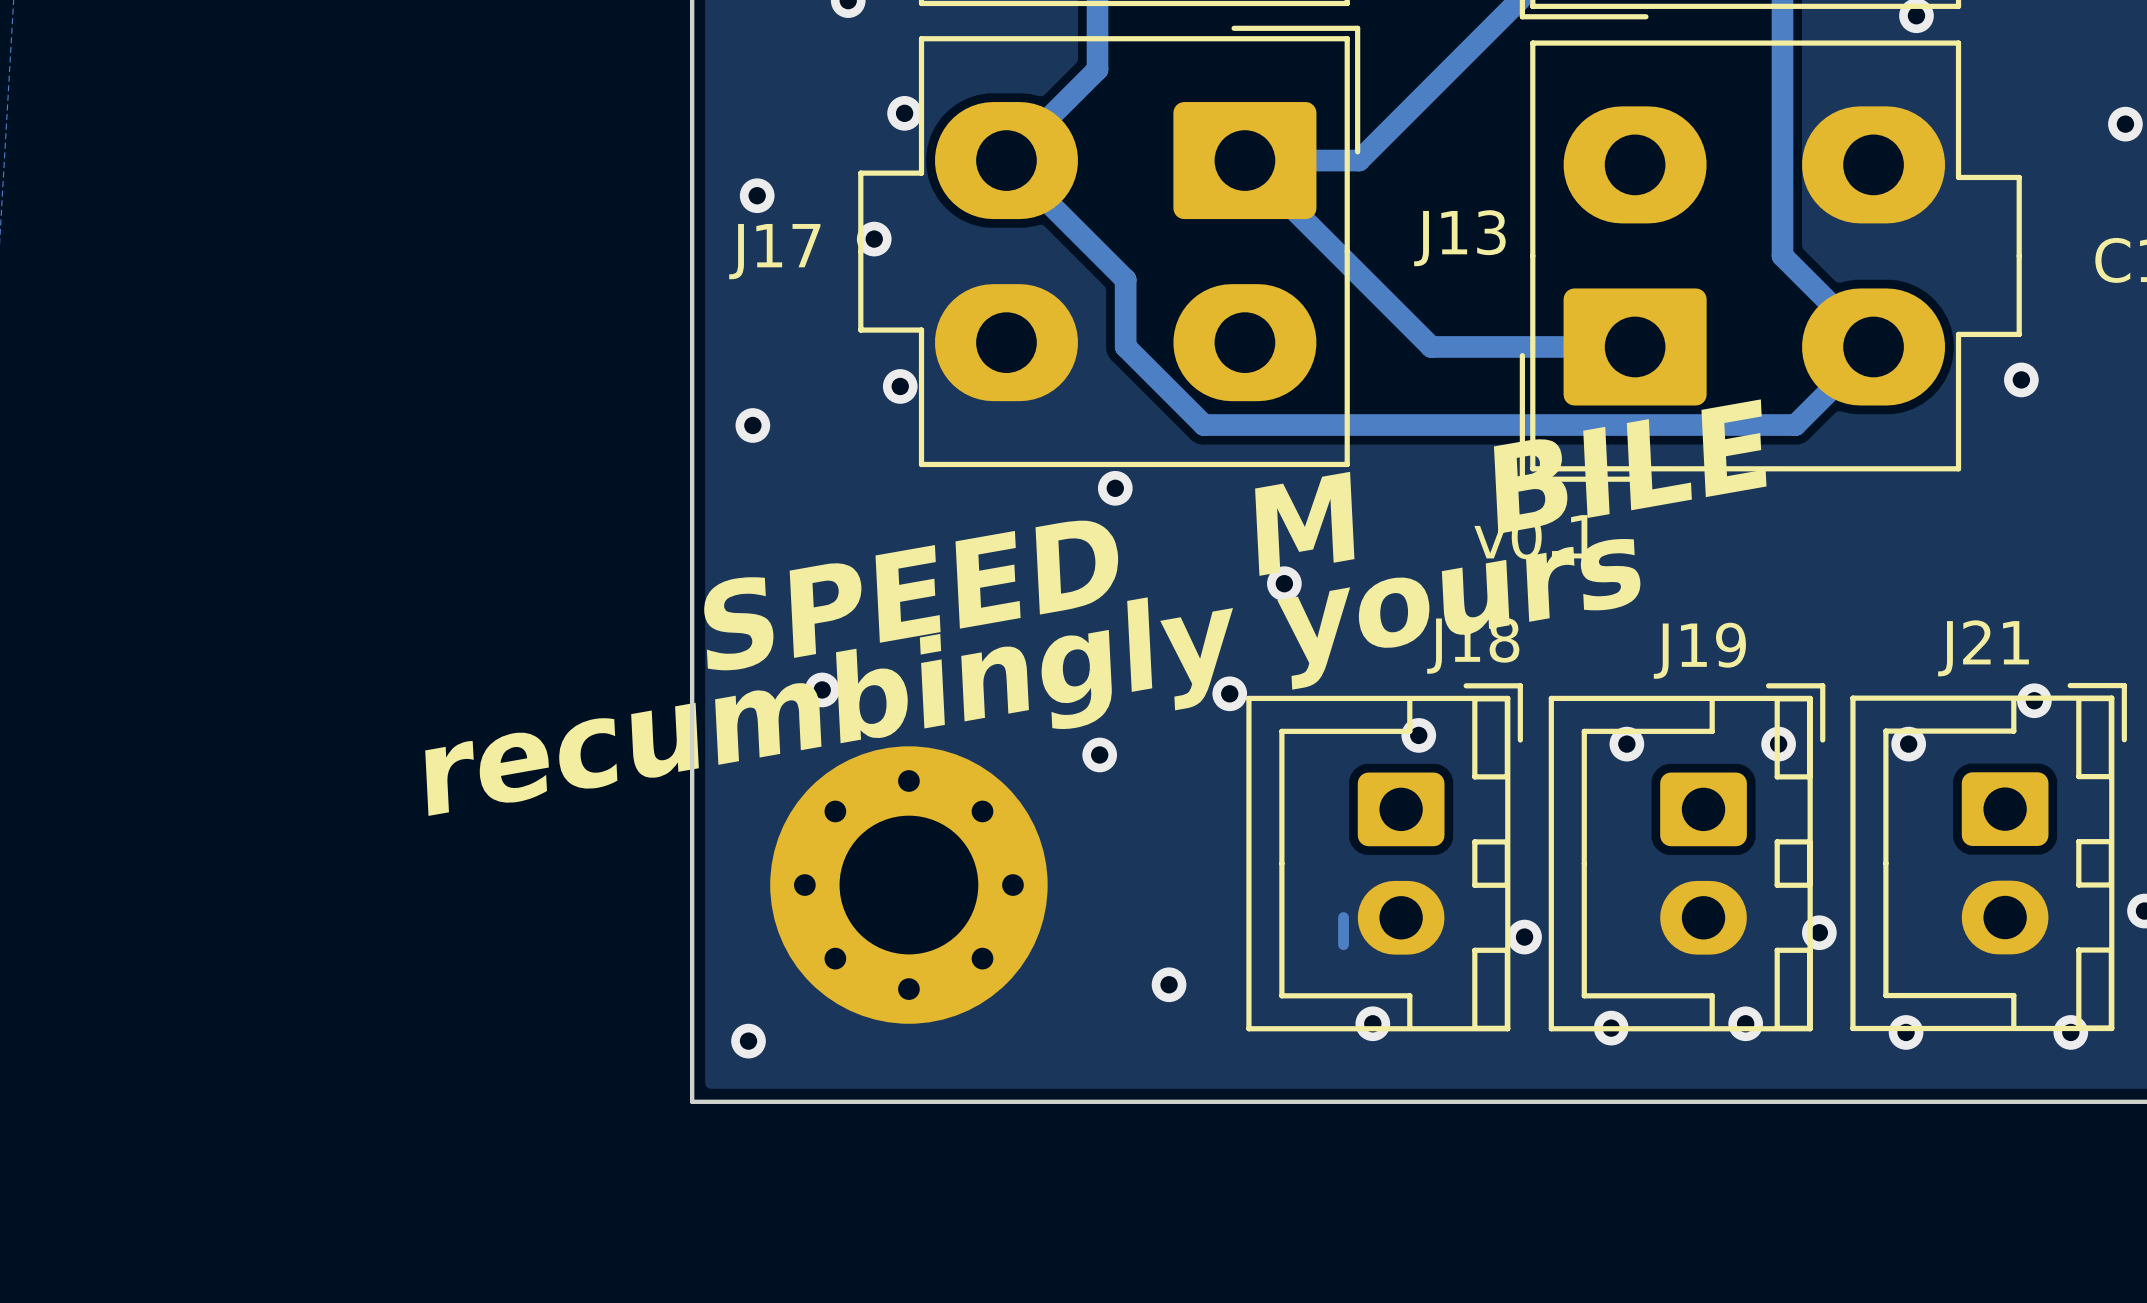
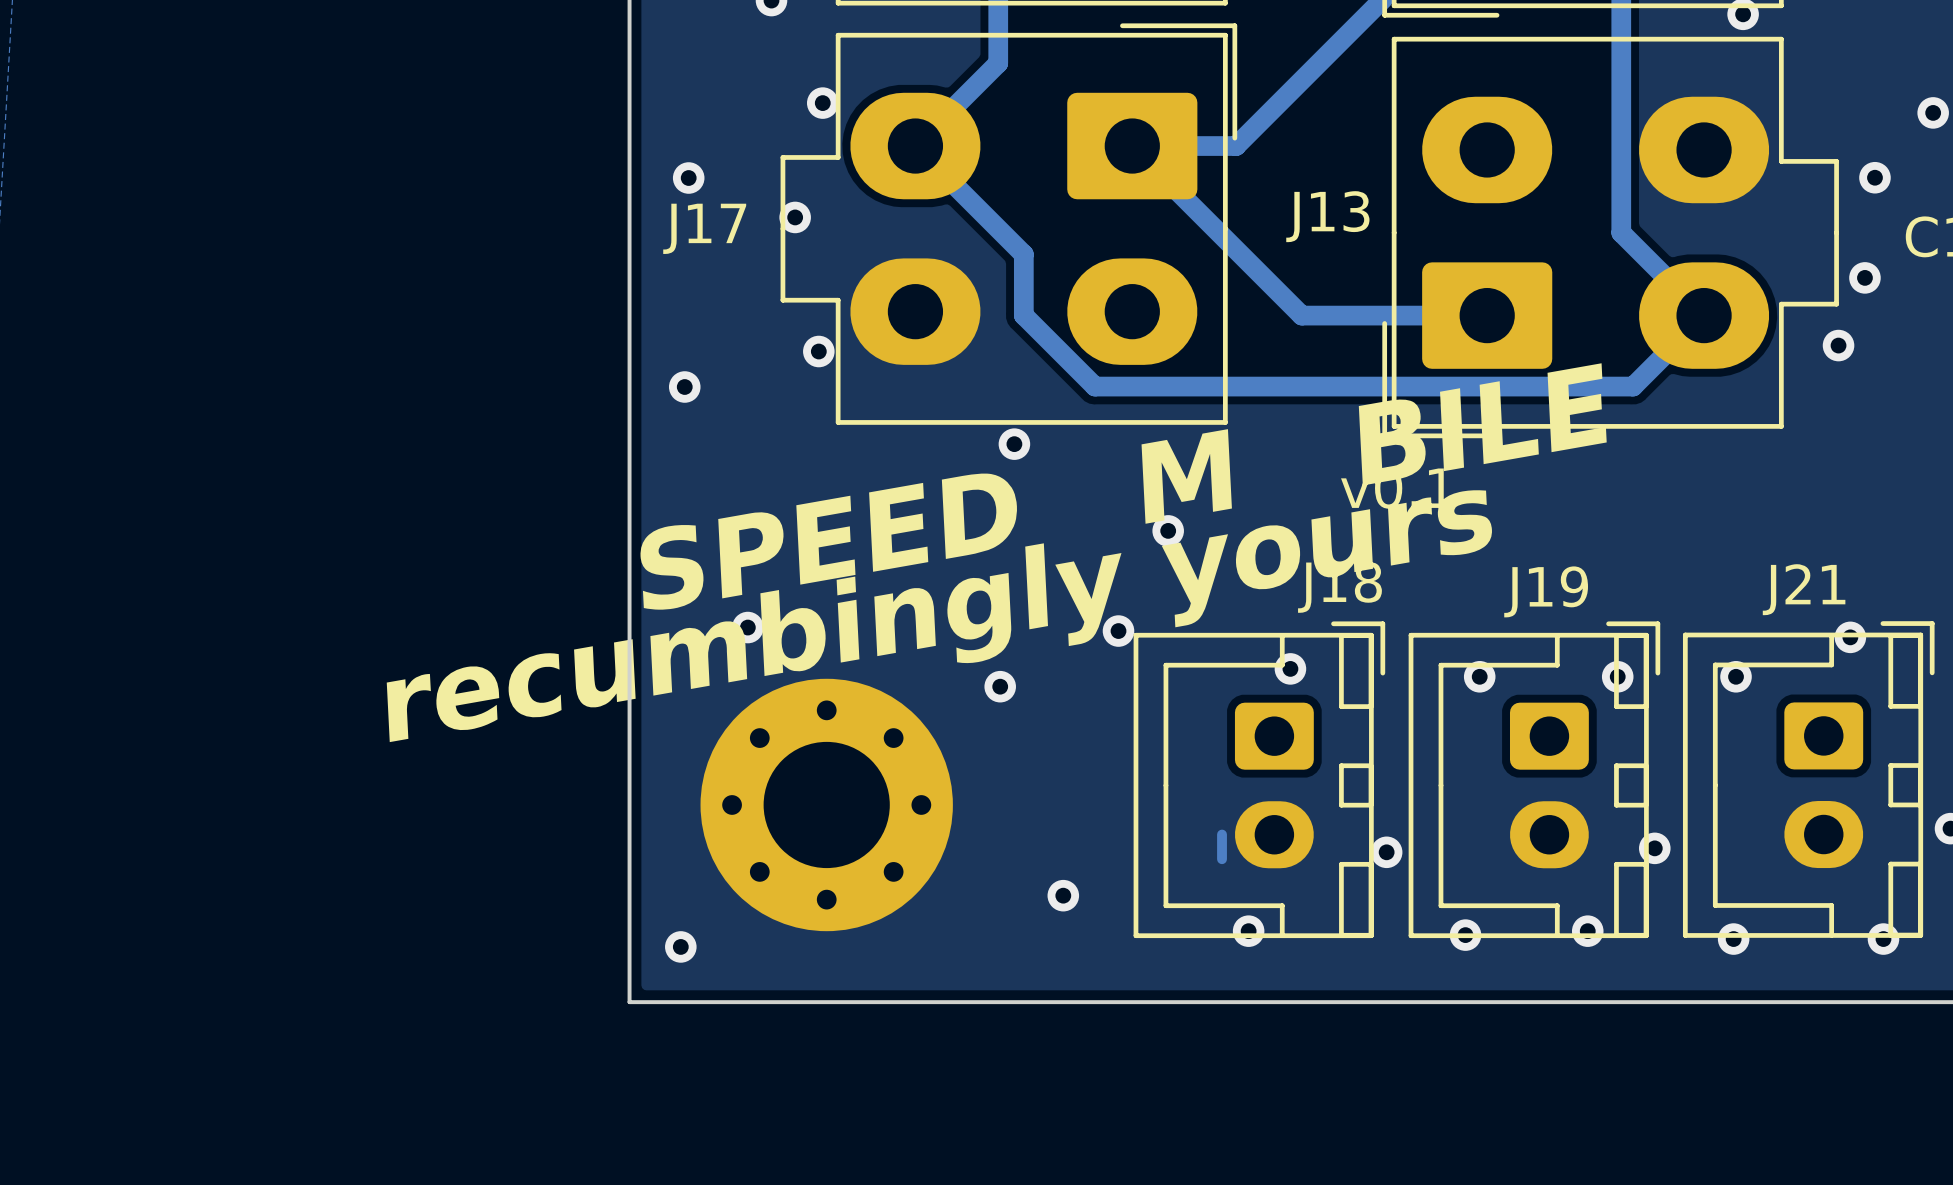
via: none -> (1874, 177)
via: none -> (1864, 277)

